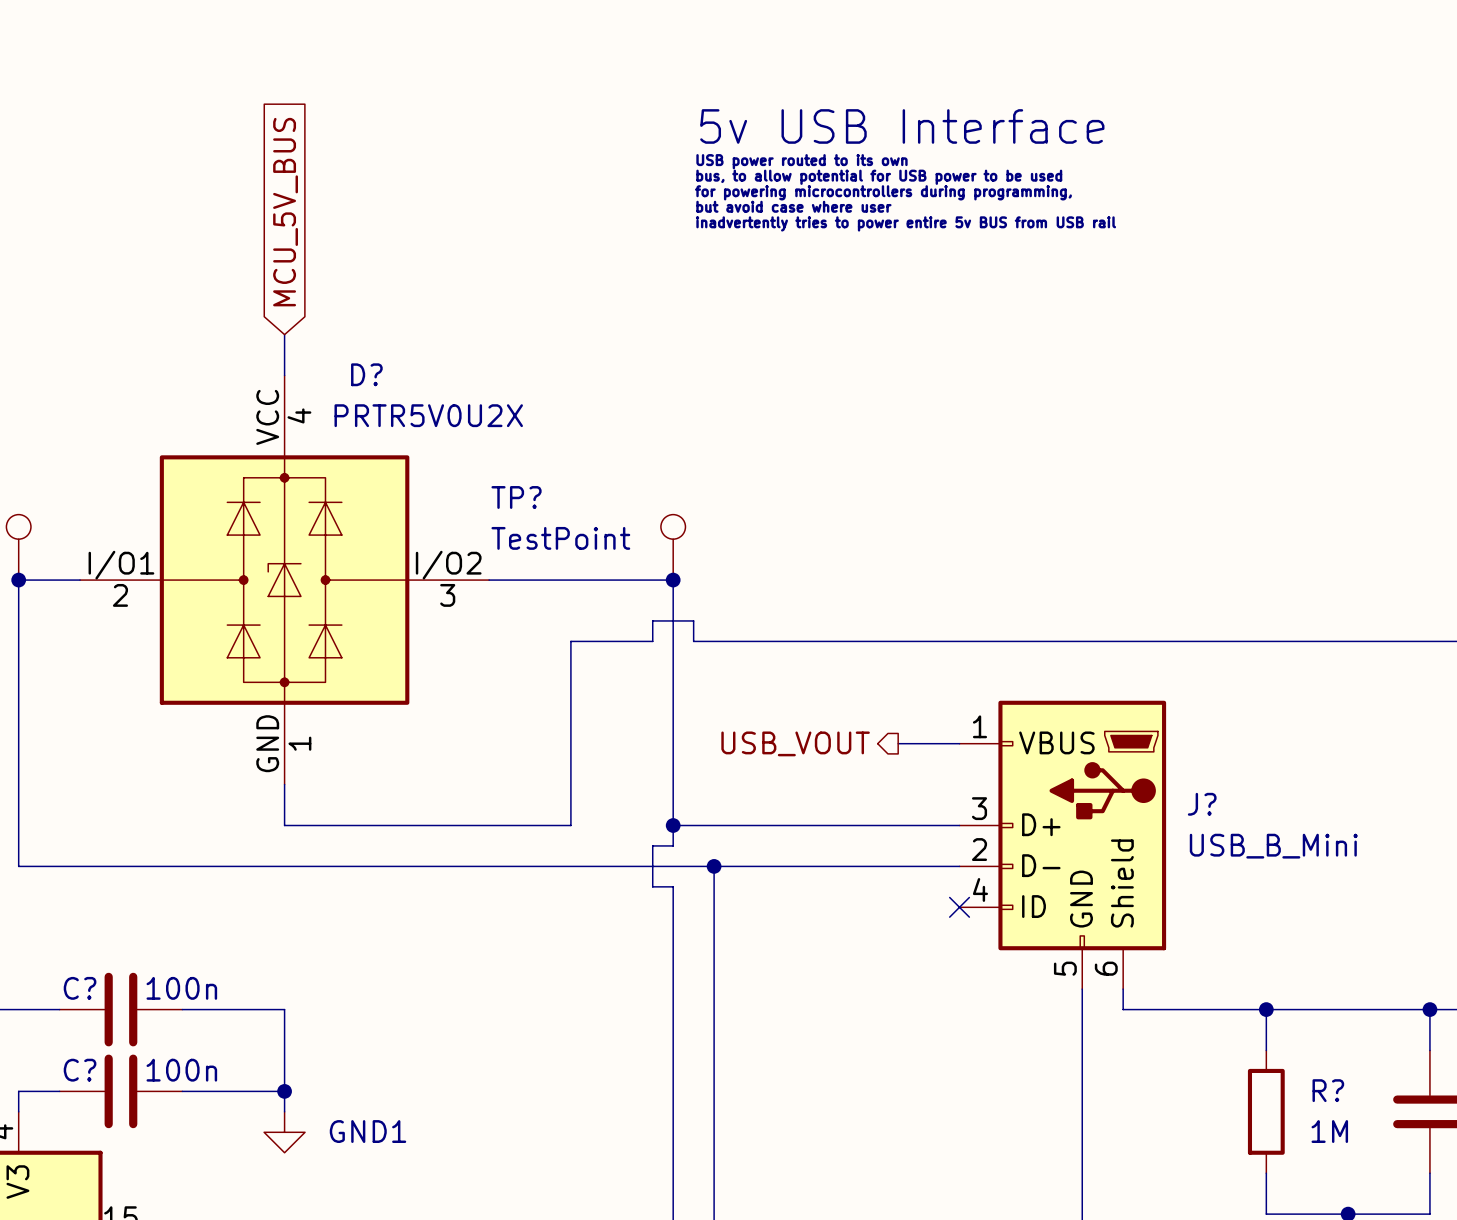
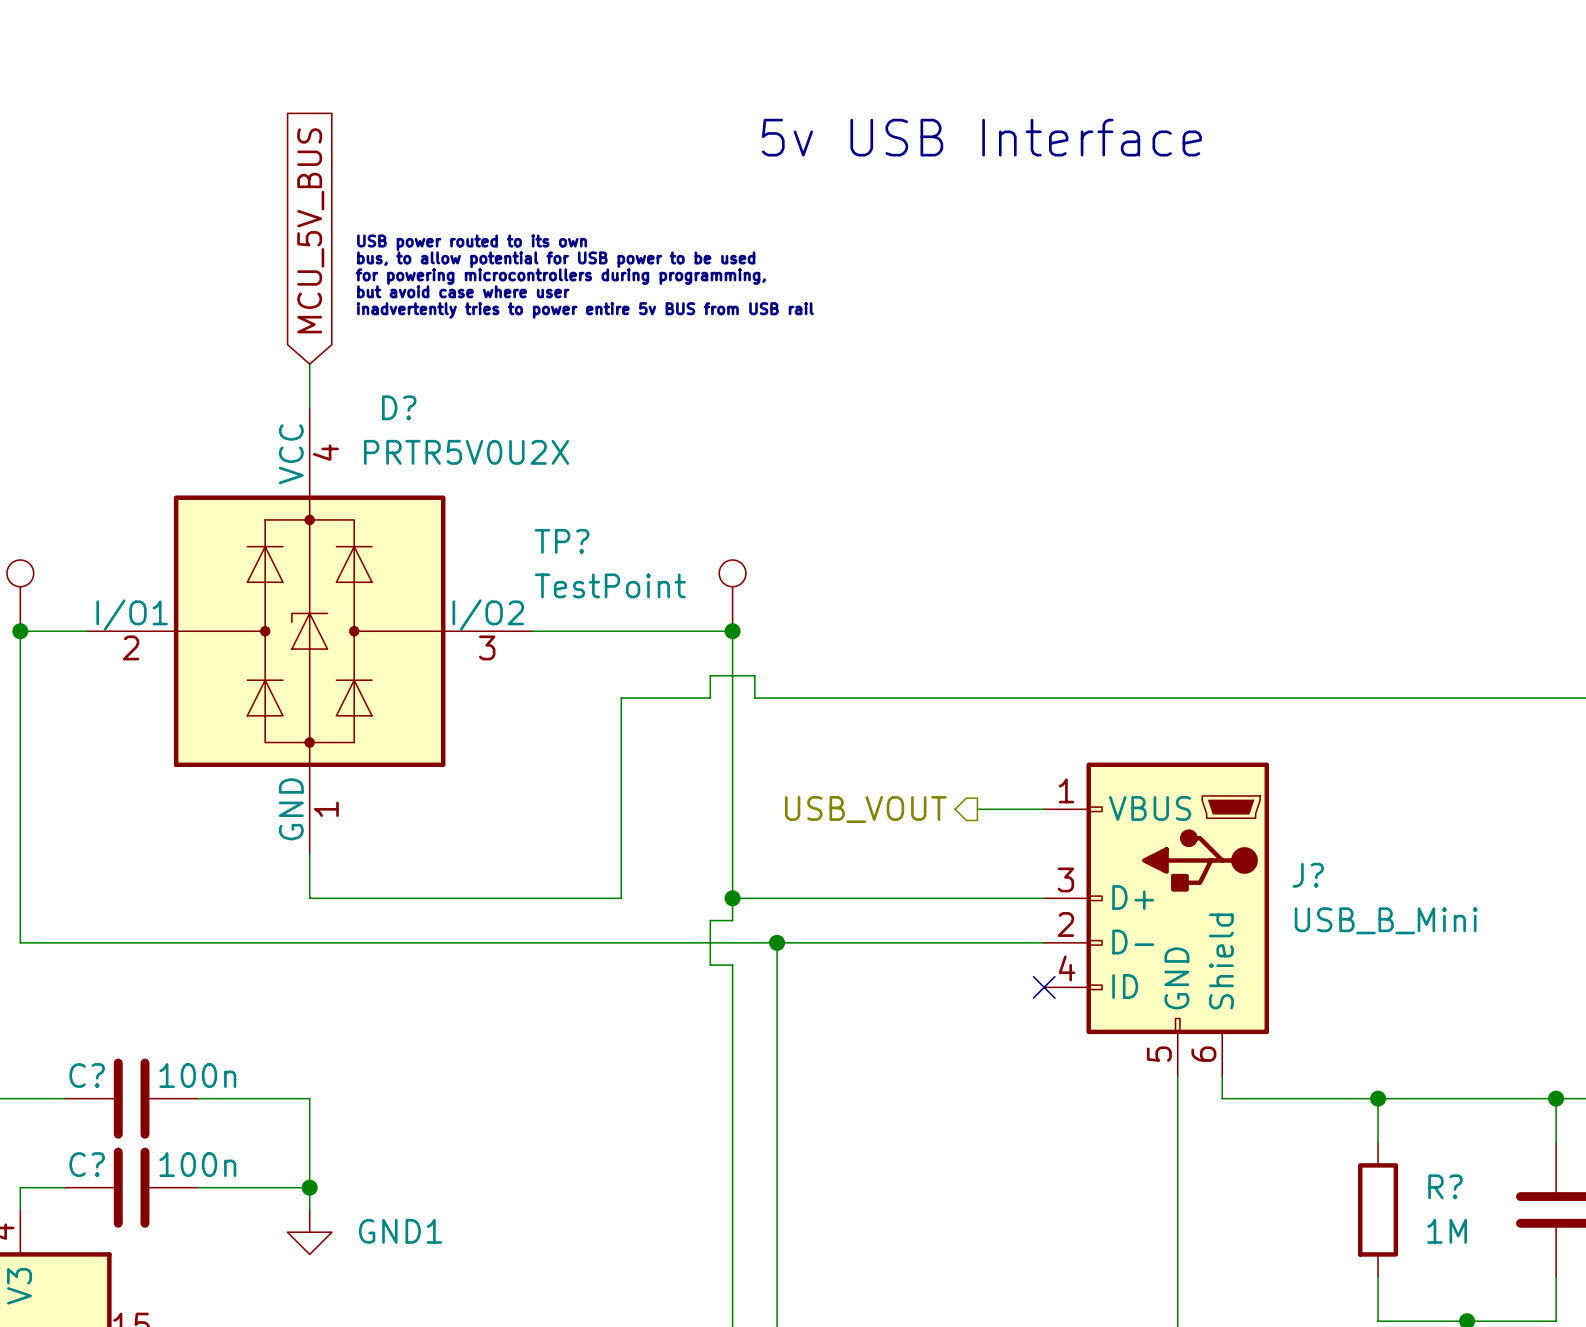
text position: USB power routed to its own (801, 161) -> USB power routed to its own (472, 242)
text position: bus, to allow potential for USB power to be used (879, 177) -> bus, to allow potential for USB power to be used (556, 259)
text position: for powering microcontrollers during programming, (883, 192) -> for powering microcontrollers during programming, (560, 276)
text position: but avoid case where user (793, 206) -> but avoid case where user (463, 291)
text position: inadvertently tries to power entire 5v BUS from USB rail (905, 223) -> inadvertently tries to power entire 5v BUS from USB rail (585, 310)

